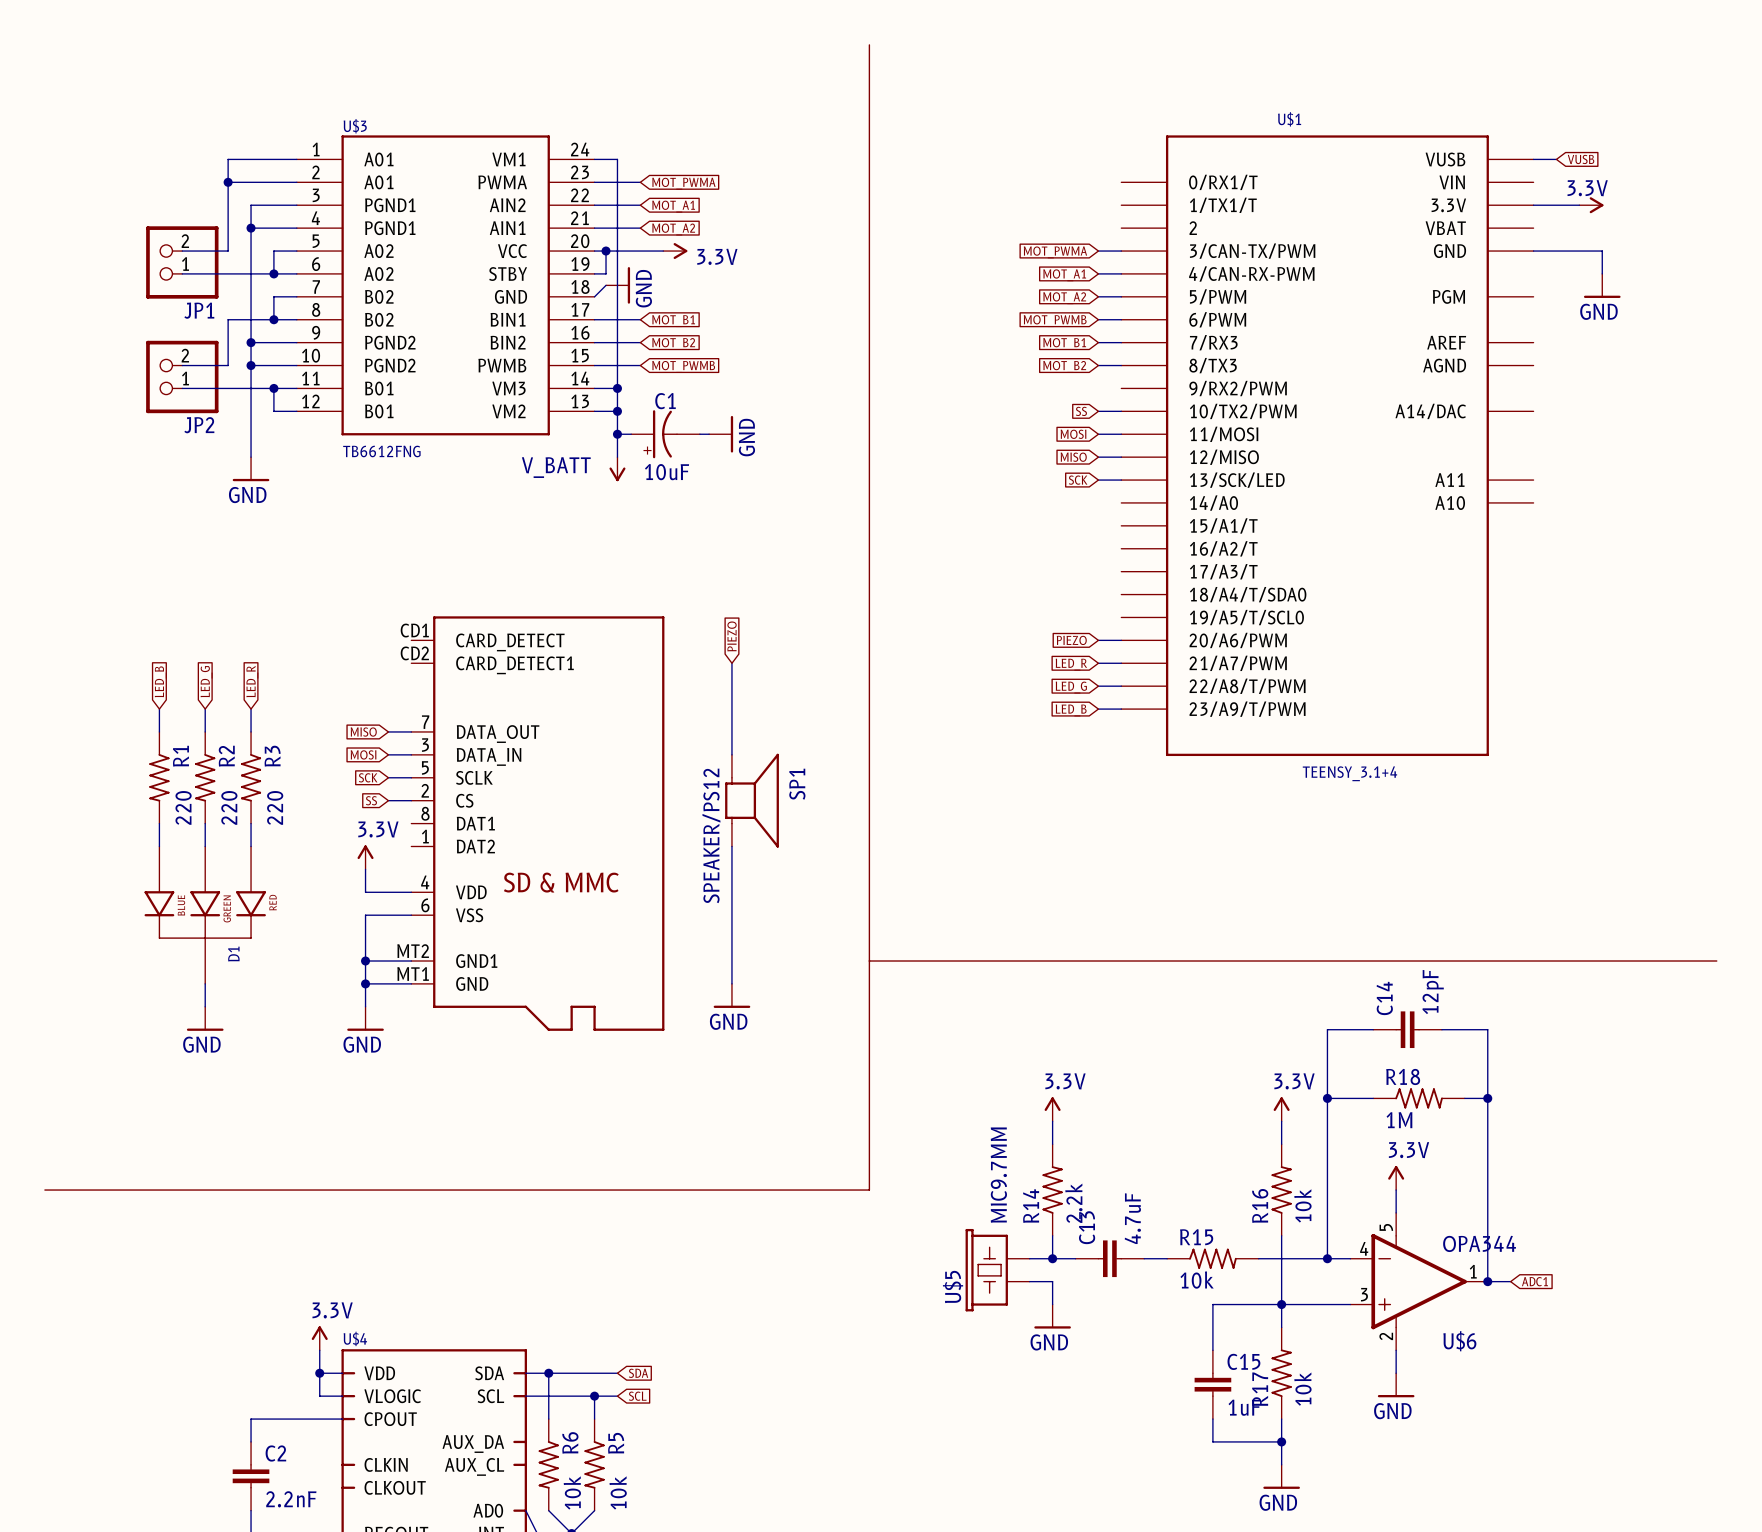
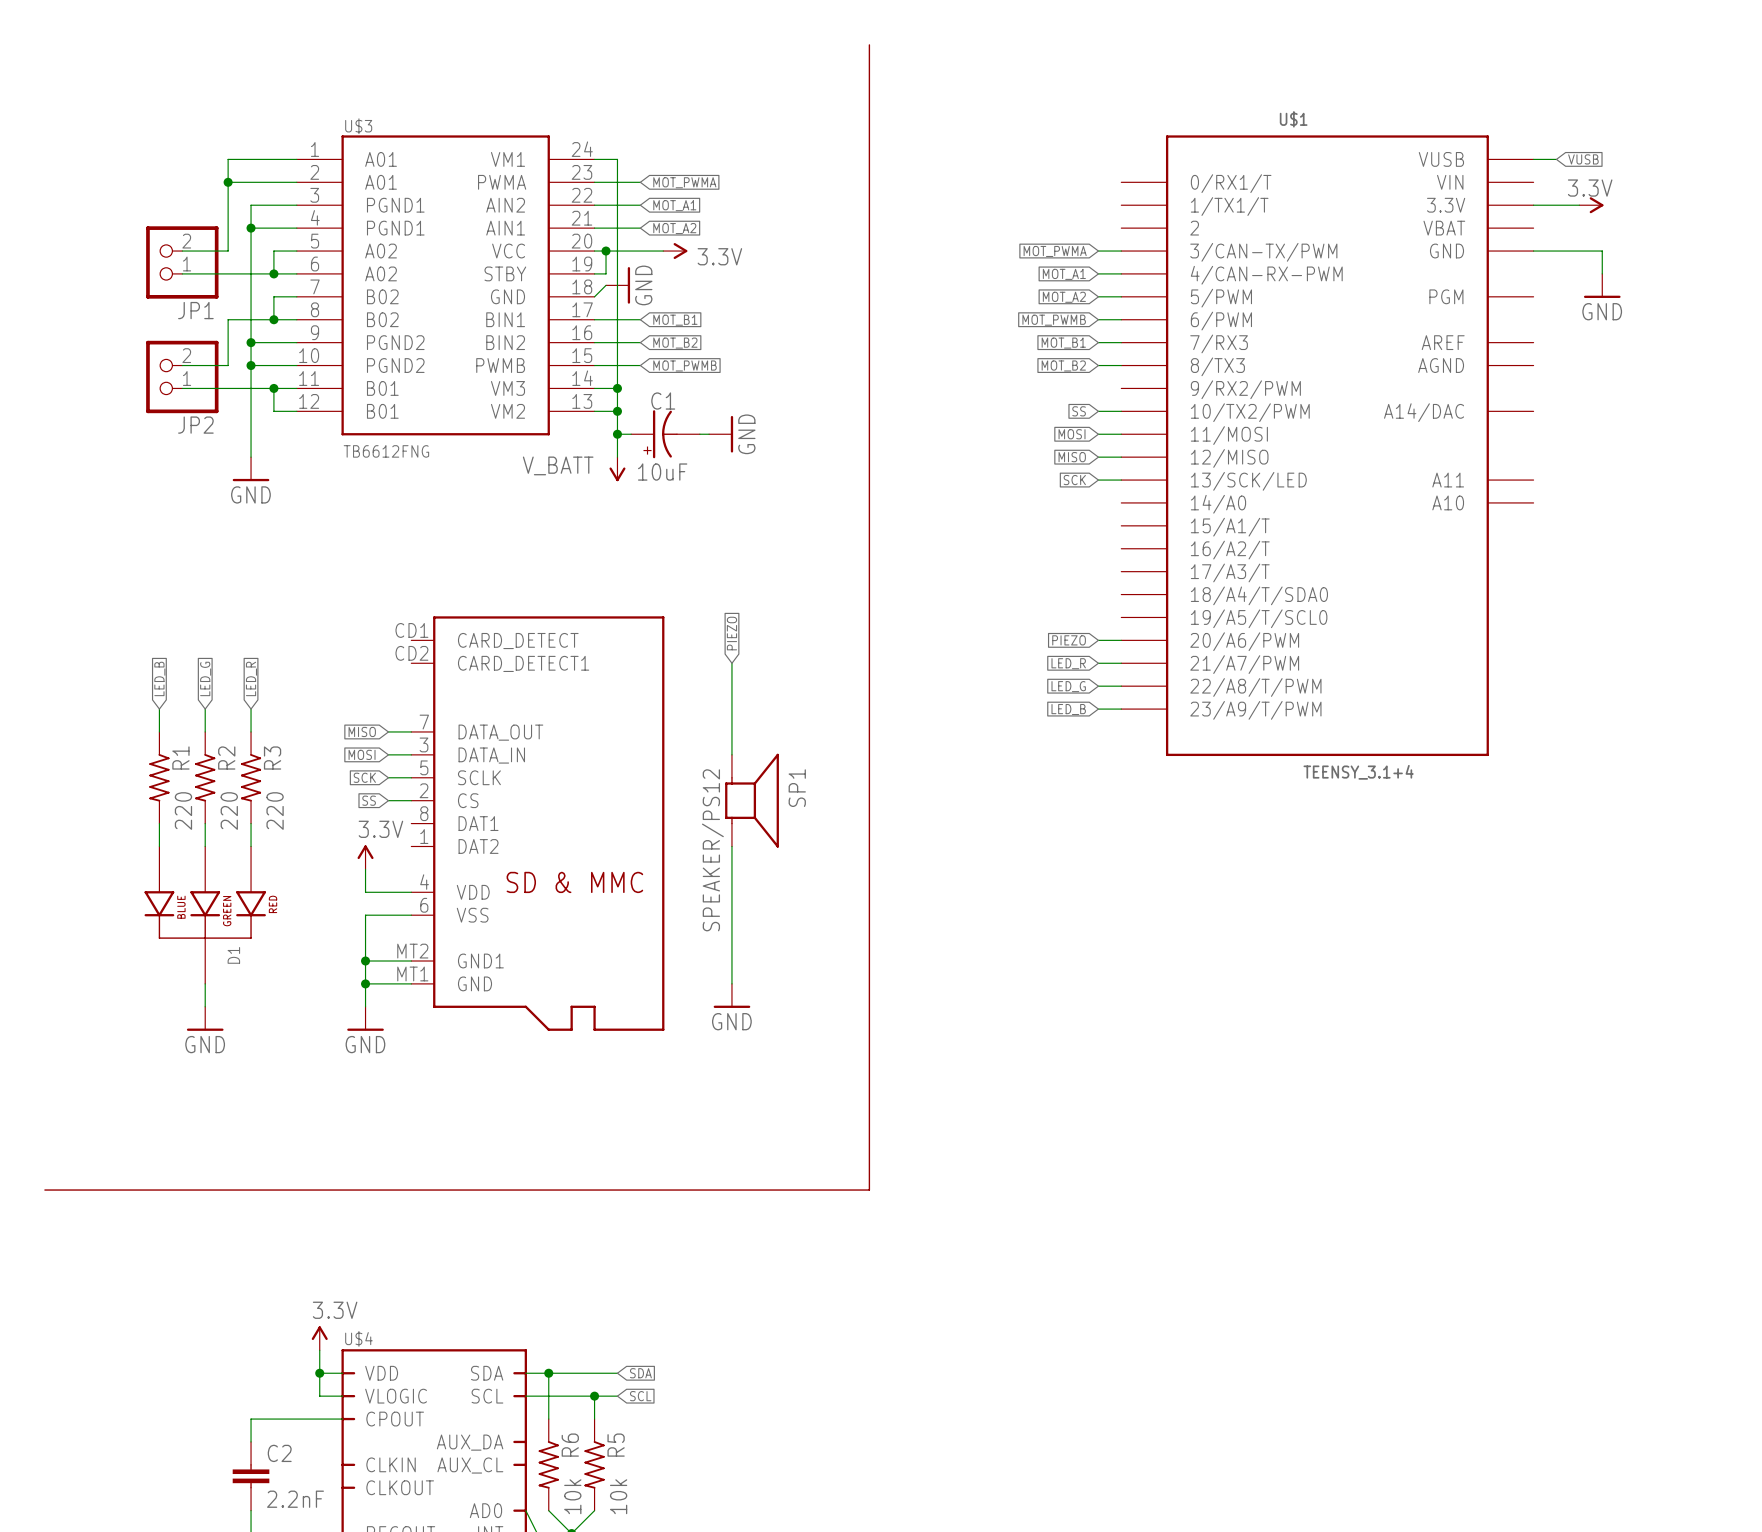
line: (869, 961) (1716, 961) -> none
wire: (1373, 1029) (1327, 1029) (1327, 1258) -> none
C14: 12pF (1407, 1029) -> none
wire: (1441, 1029) (1487, 1029) (1487, 1281) (1510, 1281) -> none
wire: (1327, 1098) (1373, 1098) -> none
junction: (1327, 1098) -> none
R18: 1M (1419, 1098) -> none
wire: (1464, 1098) (1487, 1098) -> none
junction: (1487, 1098) -> none
power symbol: 3.3V (1052, 1109) -> none
power symbol: 3.3V (1281, 1109) -> none
wire: (1052, 1121) (1052, 1144) -> none
wire: (1281, 1121) (1281, 1144) -> none
power symbol: 3.3V (1396, 1178) -> none
R14: 2.2k (1052, 1190) -> none
R16: 10k (1281, 1190) -> none
wire: (1396, 1190) (1396, 1212) -> none
wire: (1052, 1235) (1052, 1258) -> none
wire: (1281, 1235) (1281, 1327) -> none
wire: (1029, 1258) (1075, 1258) -> none
junction: (1052, 1258) -> none
C13: 4.7uF (1109, 1258) -> none
wire: (1144, 1258) (1167, 1258) -> none
R15: 10k (1212, 1258) -> none
wire: (1258, 1258) (1350, 1258) -> none
junction: (1327, 1258) -> none
U$5: MIC9.7MM (997, 1270) -> none
wire: (1029, 1281) (1052, 1281) (1052, 1304) -> none
U$6: OPA344 (1419, 1281) -> none
junction: (1487, 1281) -> none
global label: ADC1 (1534, 1281) -> none
junction: (1281, 1304) -> none
wire: (1350, 1304) (1212, 1304) (1212, 1350) -> none
power symbol: GND (1052, 1316) -> none
wire: (1396, 1350) (1396, 1373) -> none
R17: 10k (1281, 1373) -> none
C15: 1uF (1212, 1384) -> none
power symbol: GND (1396, 1385) -> none
wire: (1212, 1419) (1212, 1441) (1281, 1441) -> none
wire: (1281, 1419) (1281, 1464) -> none
junction: (1281, 1441) -> none
power symbol: GND (1281, 1476) -> none

